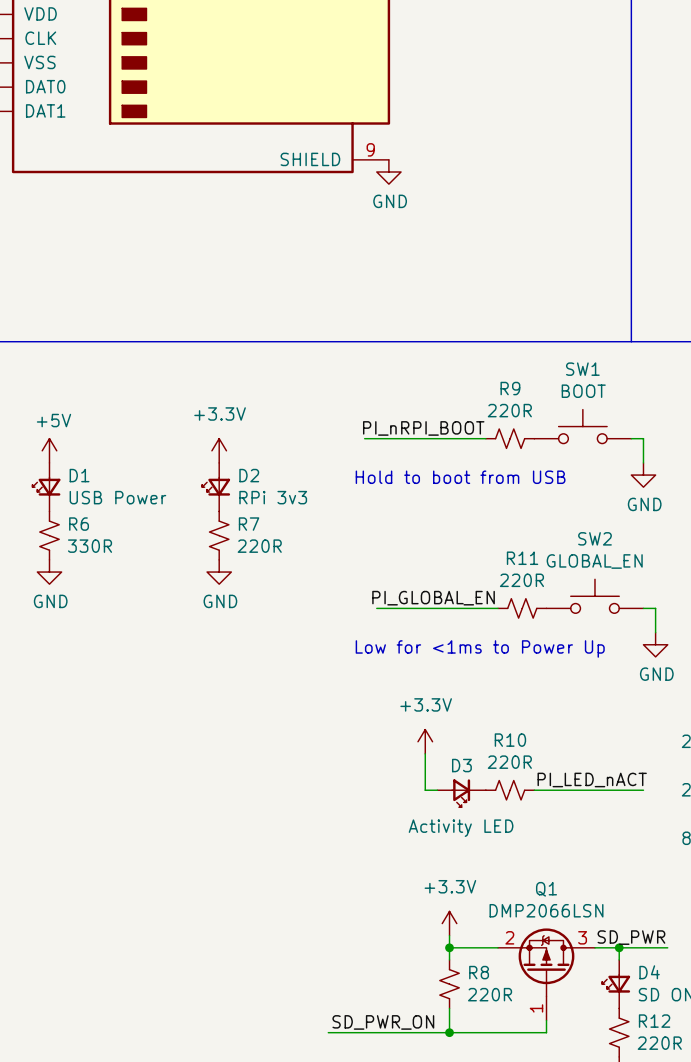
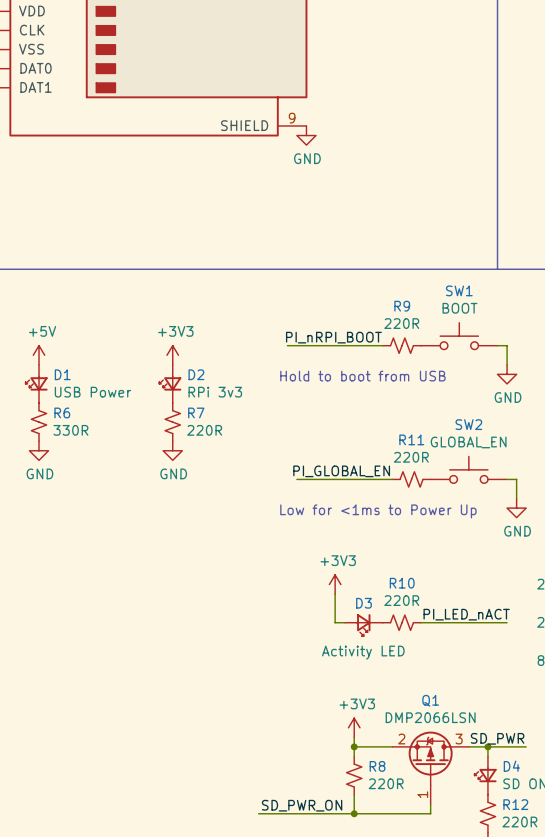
power symbol: +3.3V (219, 450) -> +3V3 (172, 355)
power symbol: +3.3V (425, 741) -> +3V3 (335, 584)
power symbol: +3.3V (449, 923) -> +3V3 (354, 727)

